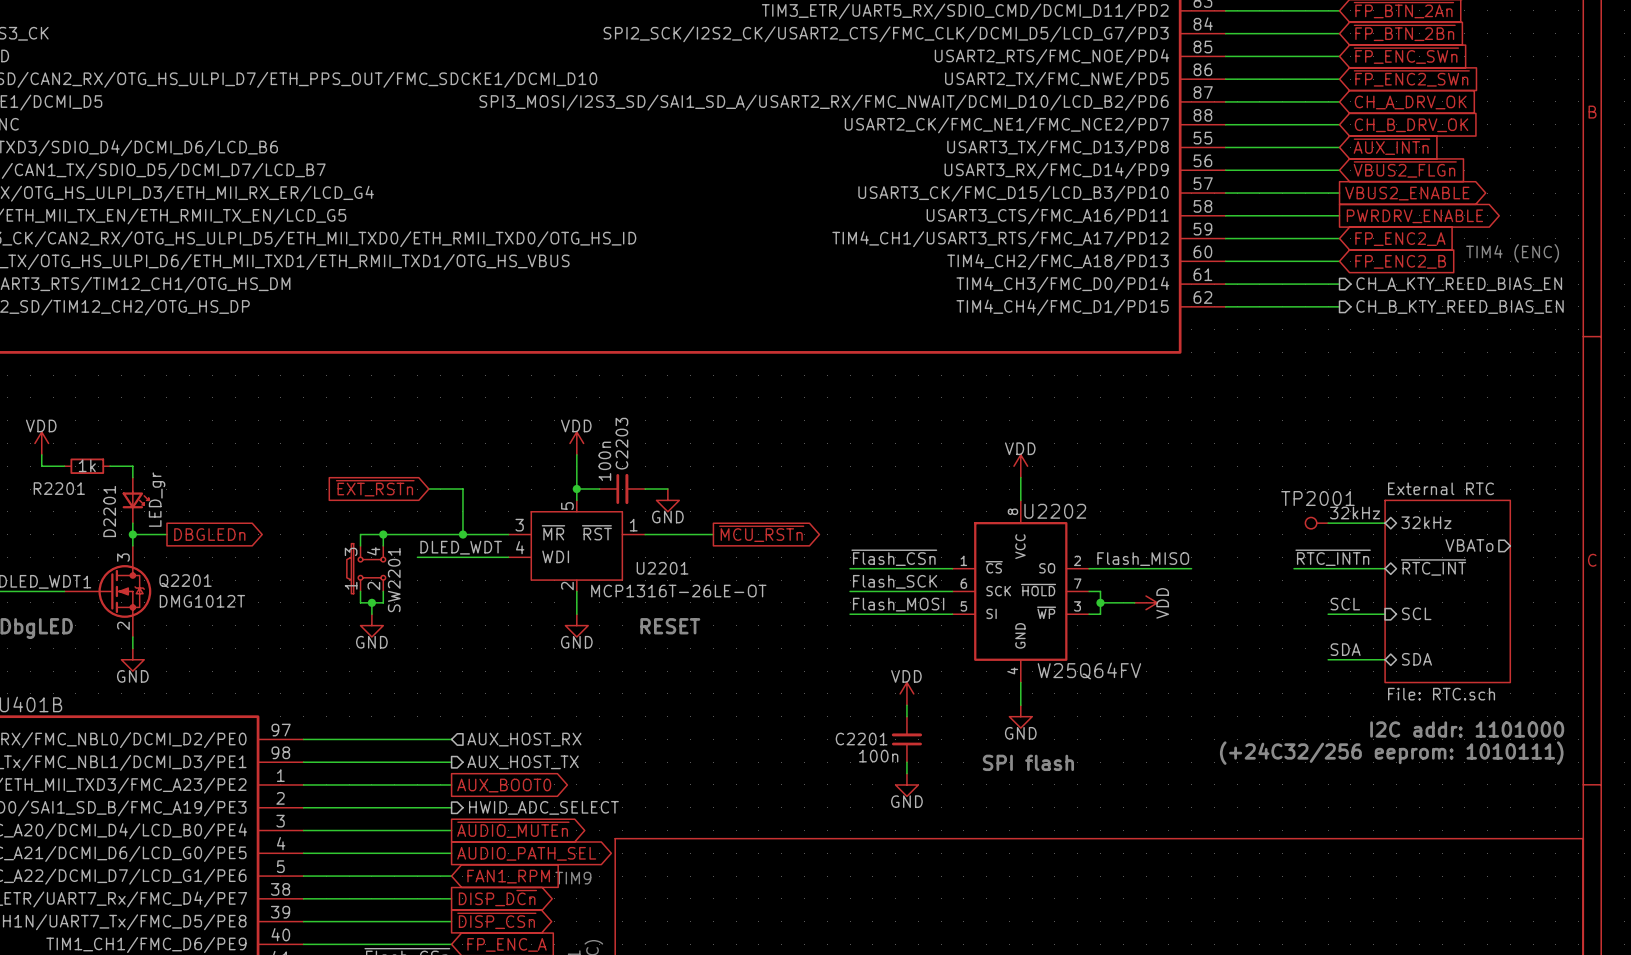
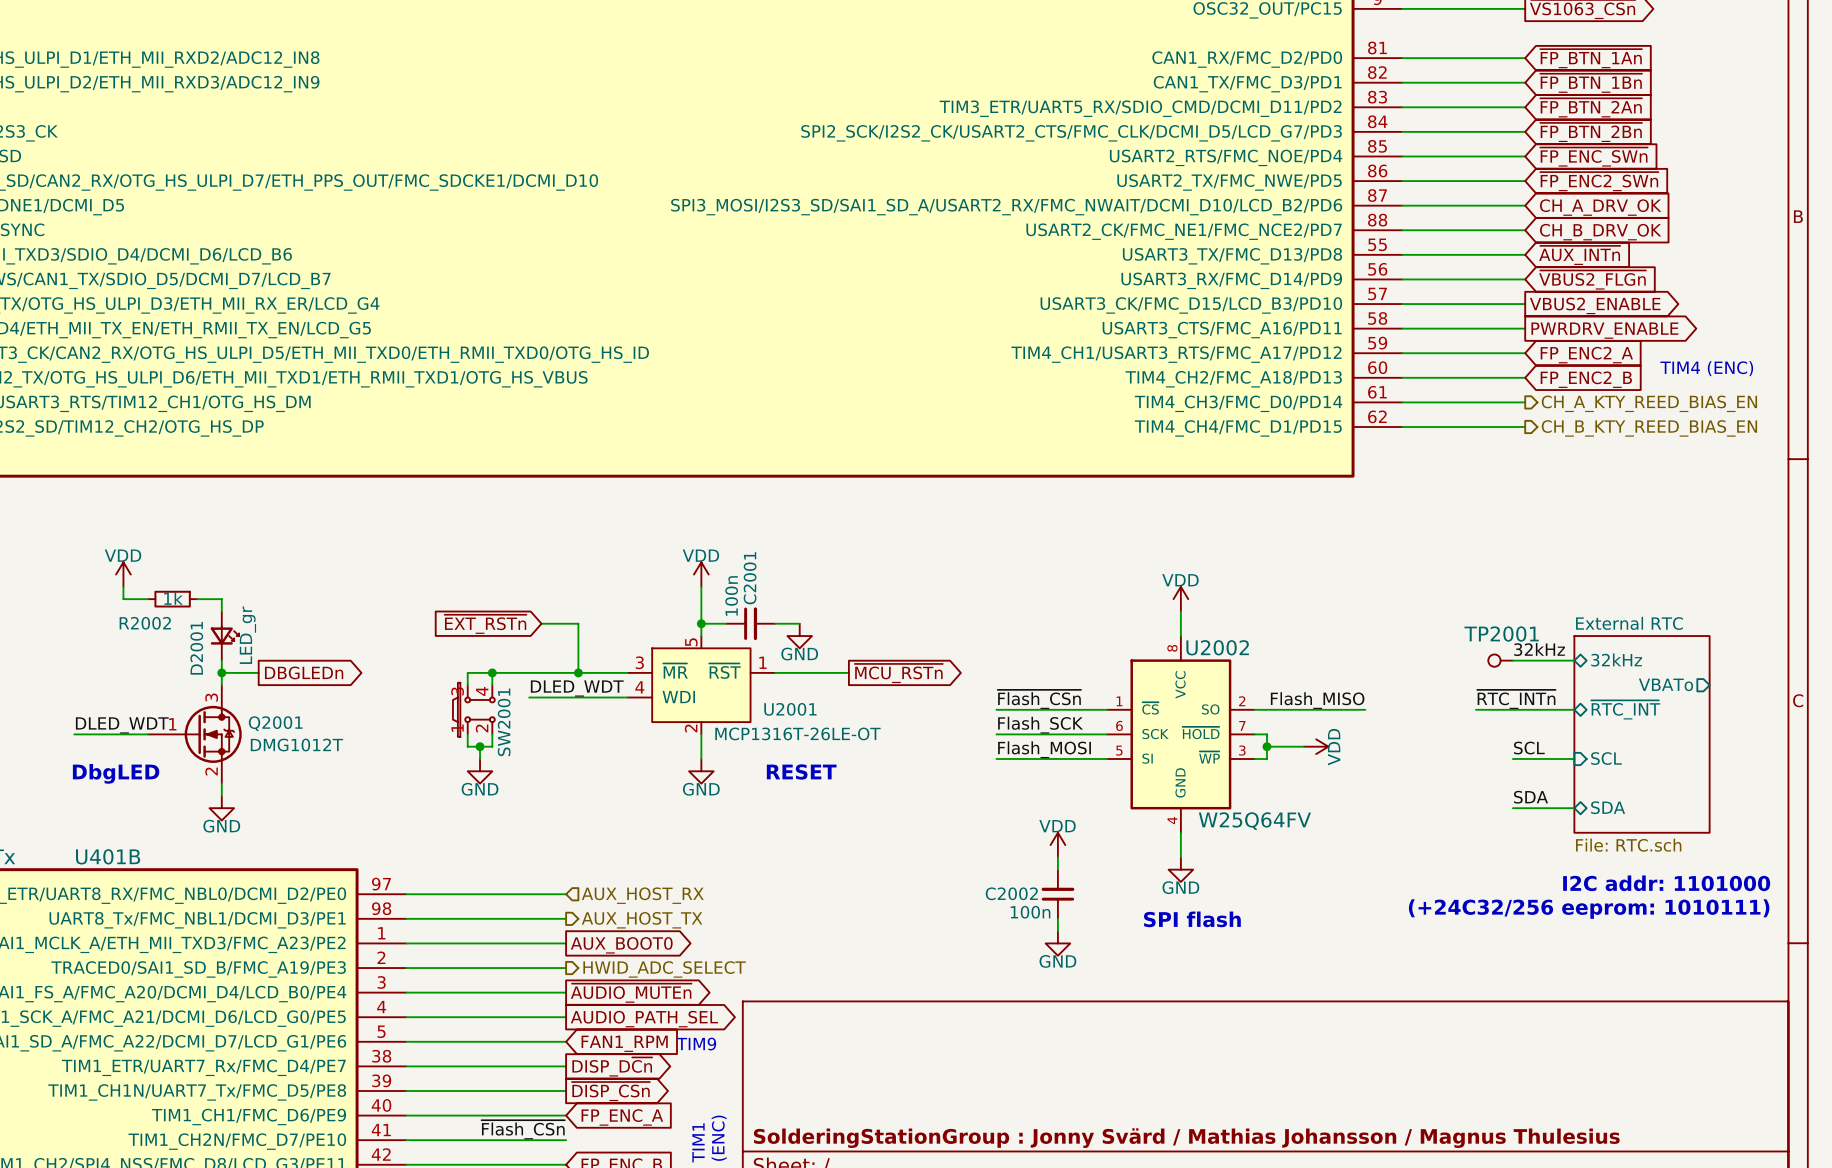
C2203 name: C2203 (621, 443) -> C2001 (750, 578)
R2201 name: R2201 (59, 488) -> R2002 (145, 623)
D2201 name: D2201 (109, 511) -> D2001 (196, 648)
U2202 name: U2202 (1055, 511) -> U2002 (1217, 647)
U2201 name: U2201 (662, 568) -> U2001 (790, 709)
SW2201 name: SW2201 (394, 580) -> SW2001 (504, 722)
Q2201 name: Q2201 (185, 581) -> Q2001 (275, 723)
C2201 name: C2201 (861, 739) -> C2002 (1011, 893)

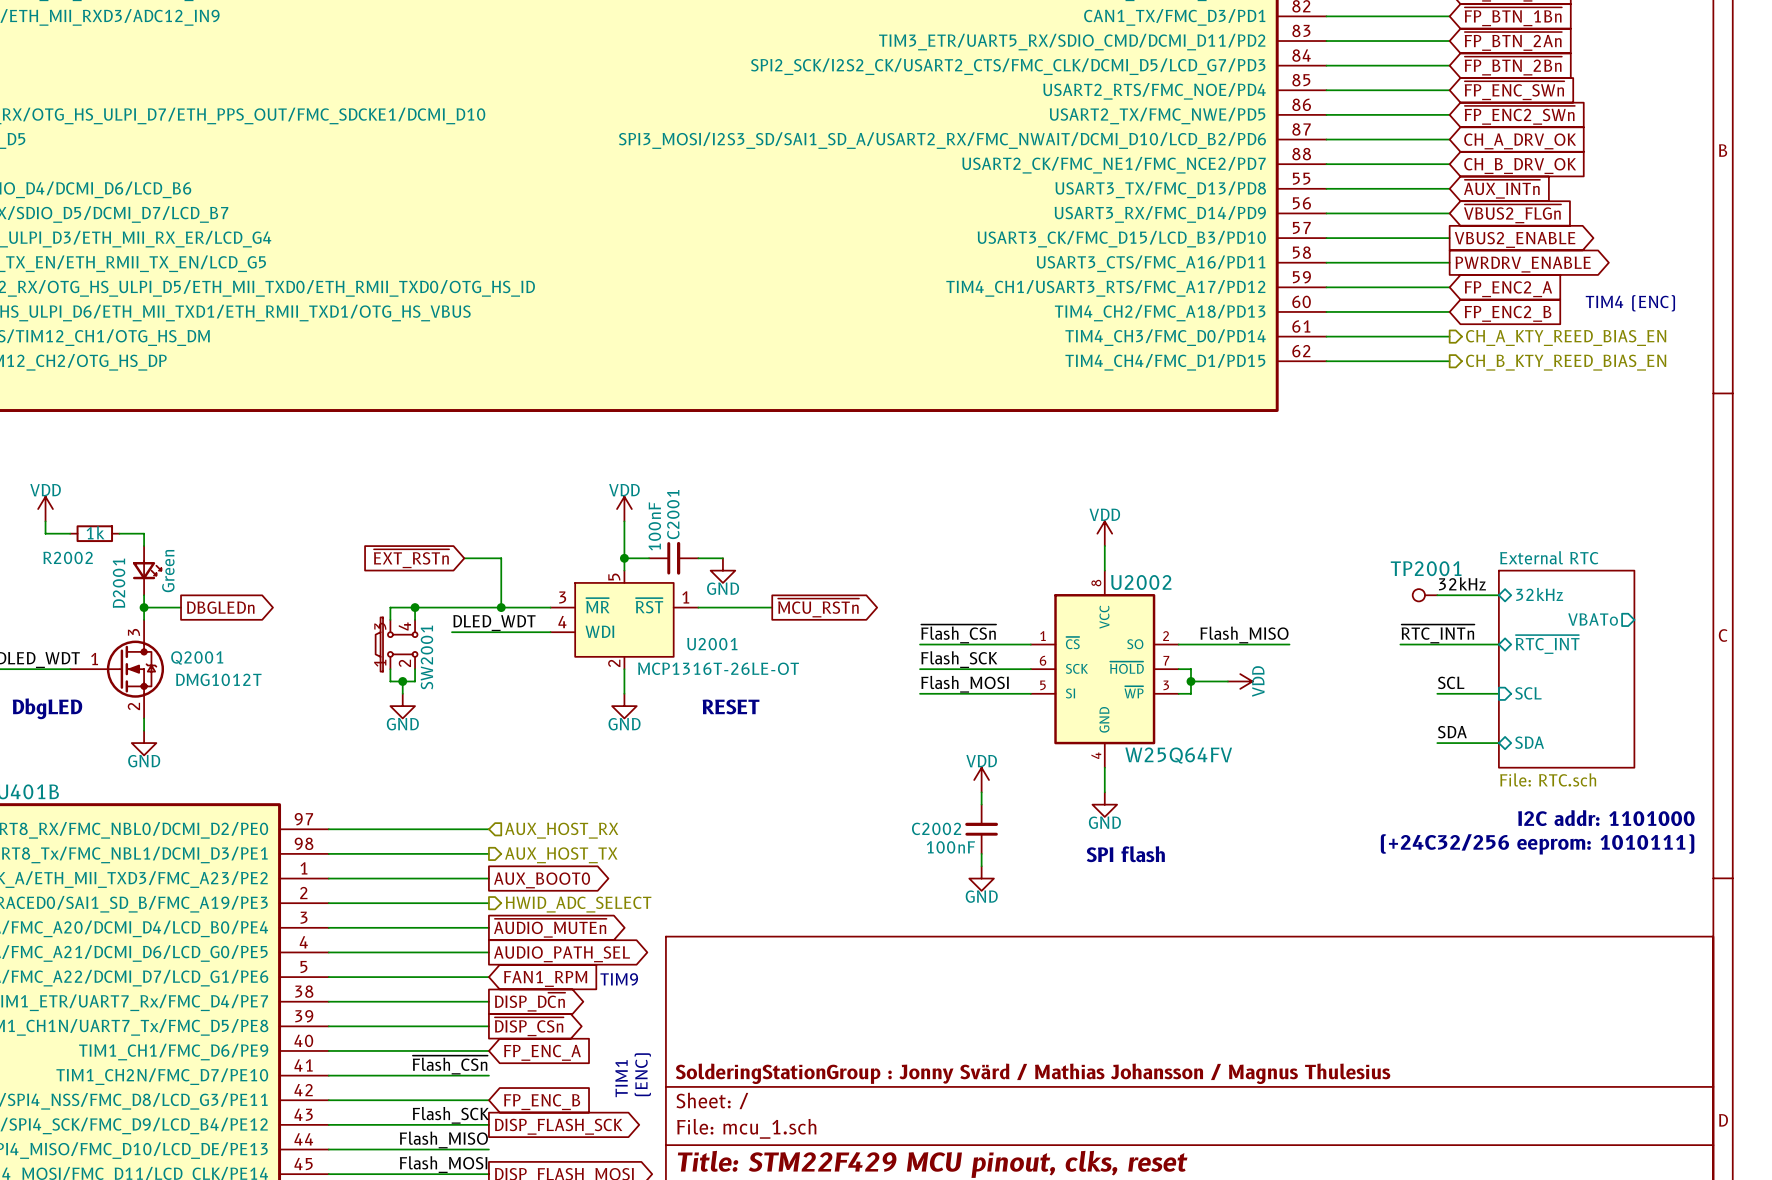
C2001 value: 100n (731, 595) -> 100nF (654, 526)
D2001 value: LED_gr (247, 635) -> Green (168, 571)
C2002 value: 100n (1030, 912) -> 100nF (950, 847)

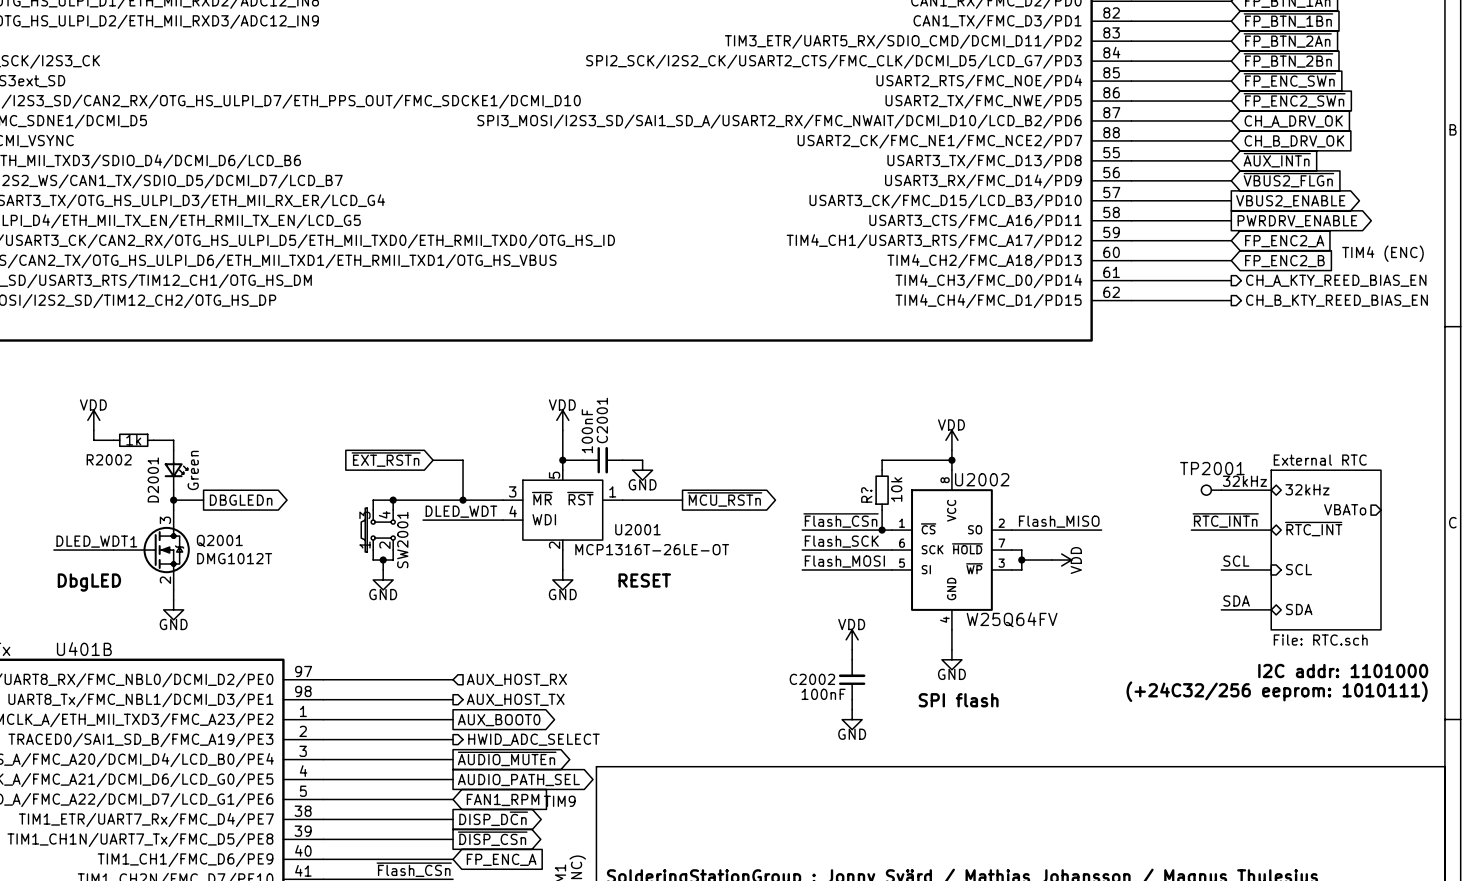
wire: none -> (951, 460) (882, 460) (882, 470)
junction: none -> (951, 460)
R?: none -> 10k (882, 490)
wire: none -> (882, 510) (882, 530)
junction: none -> (882, 530)

